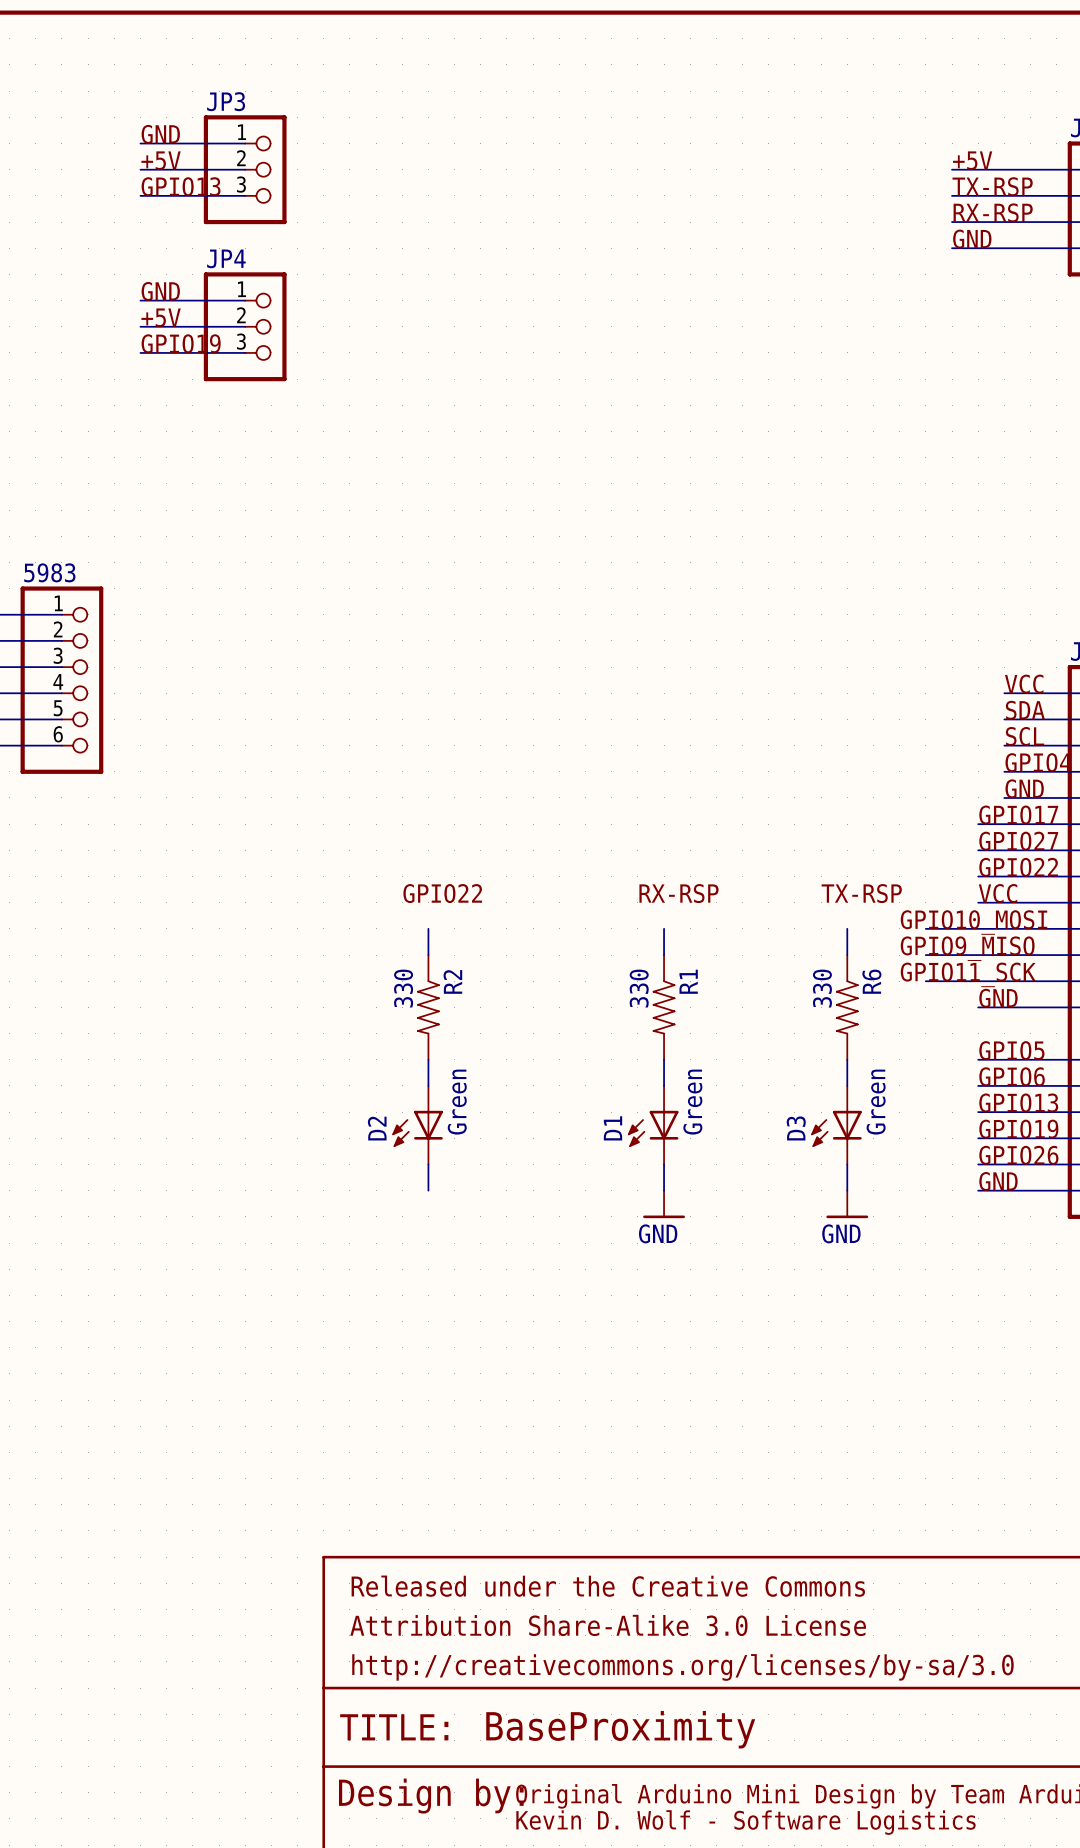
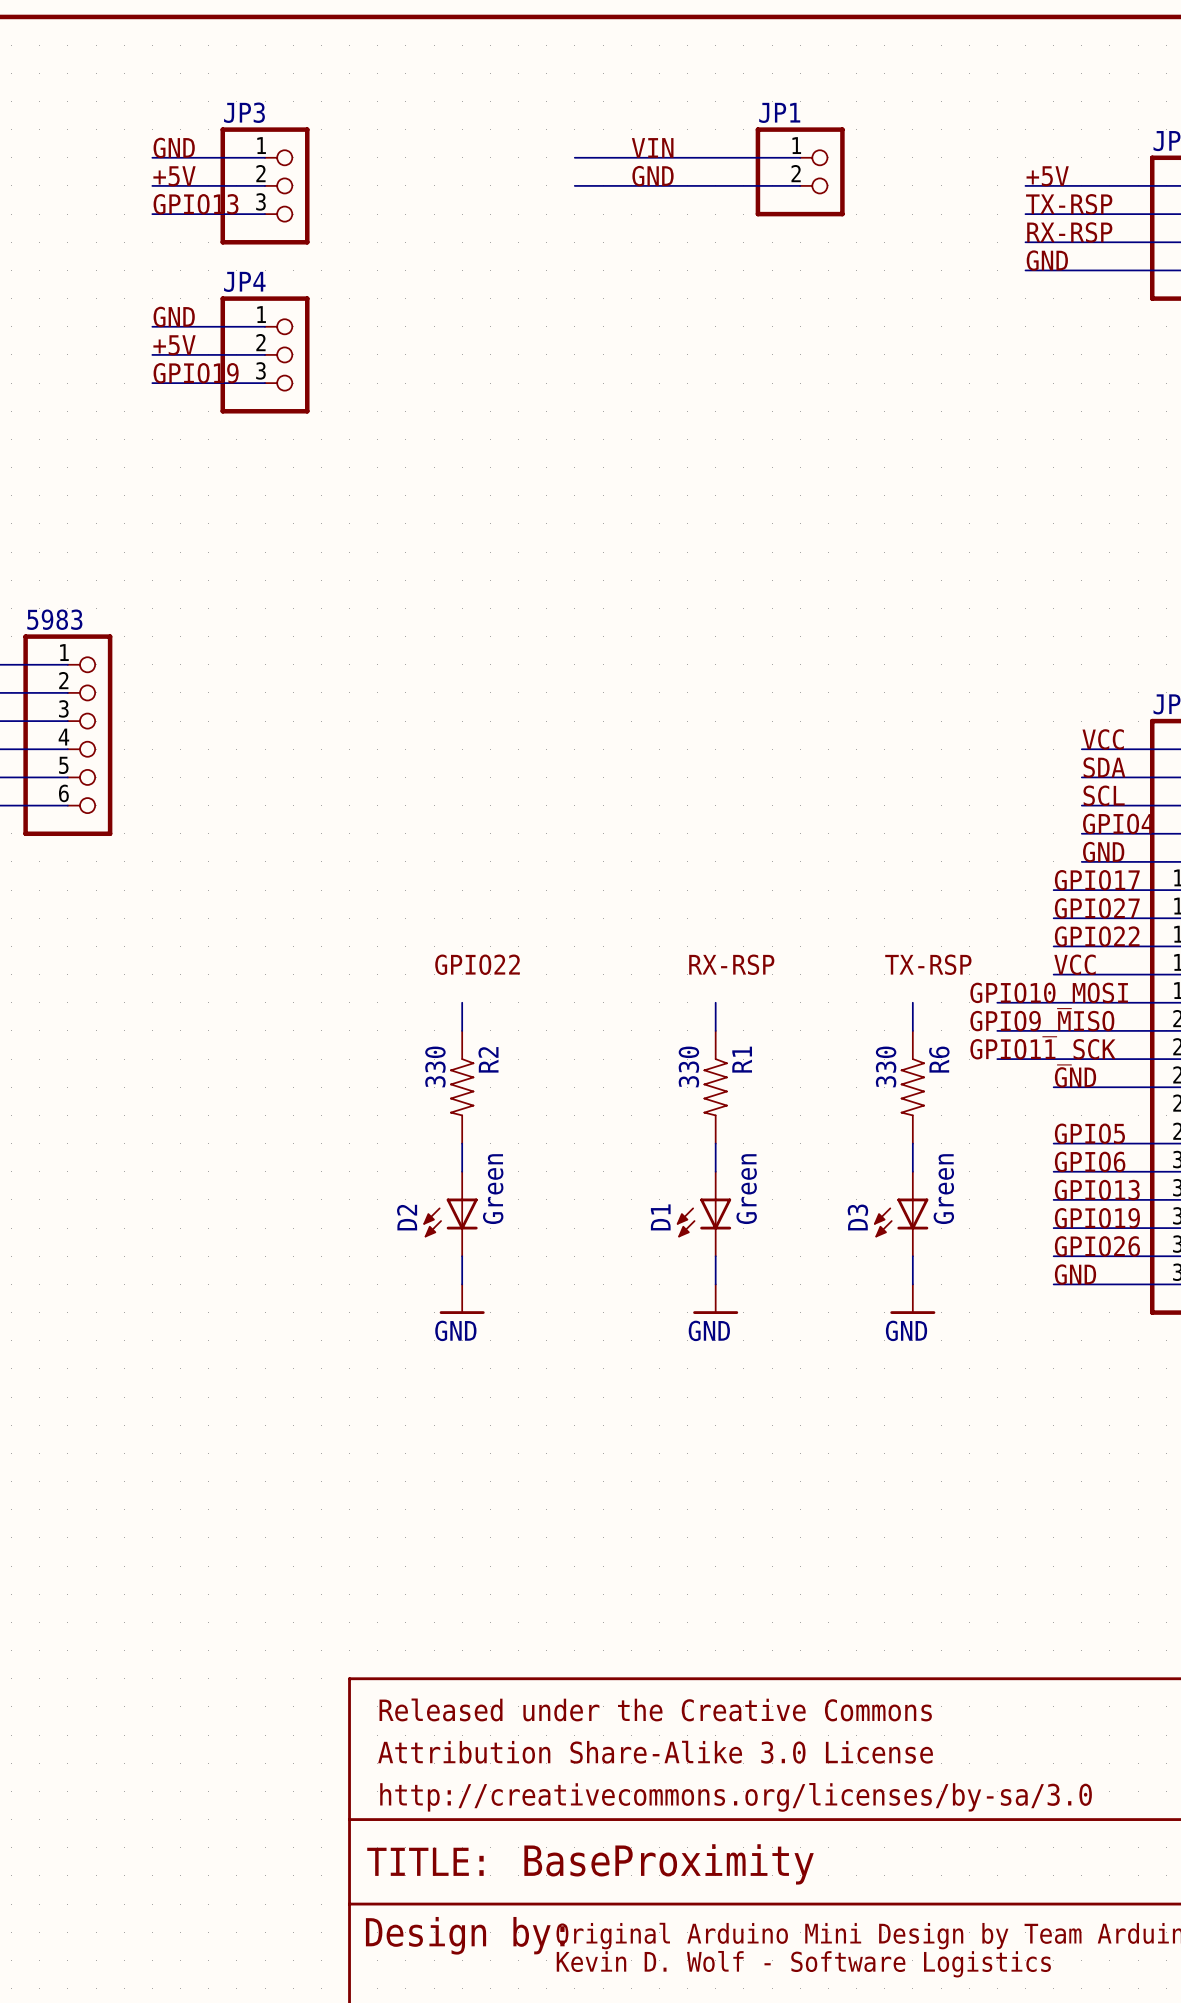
label: none -> VIN (652, 147)
wire: none -> (574, 157) (800, 157)
JP1: none -> (800, 171)
label: none -> GND (653, 176)
wire: none -> (574, 185) (800, 185)
power symbol: none -> GND (462, 1299)

